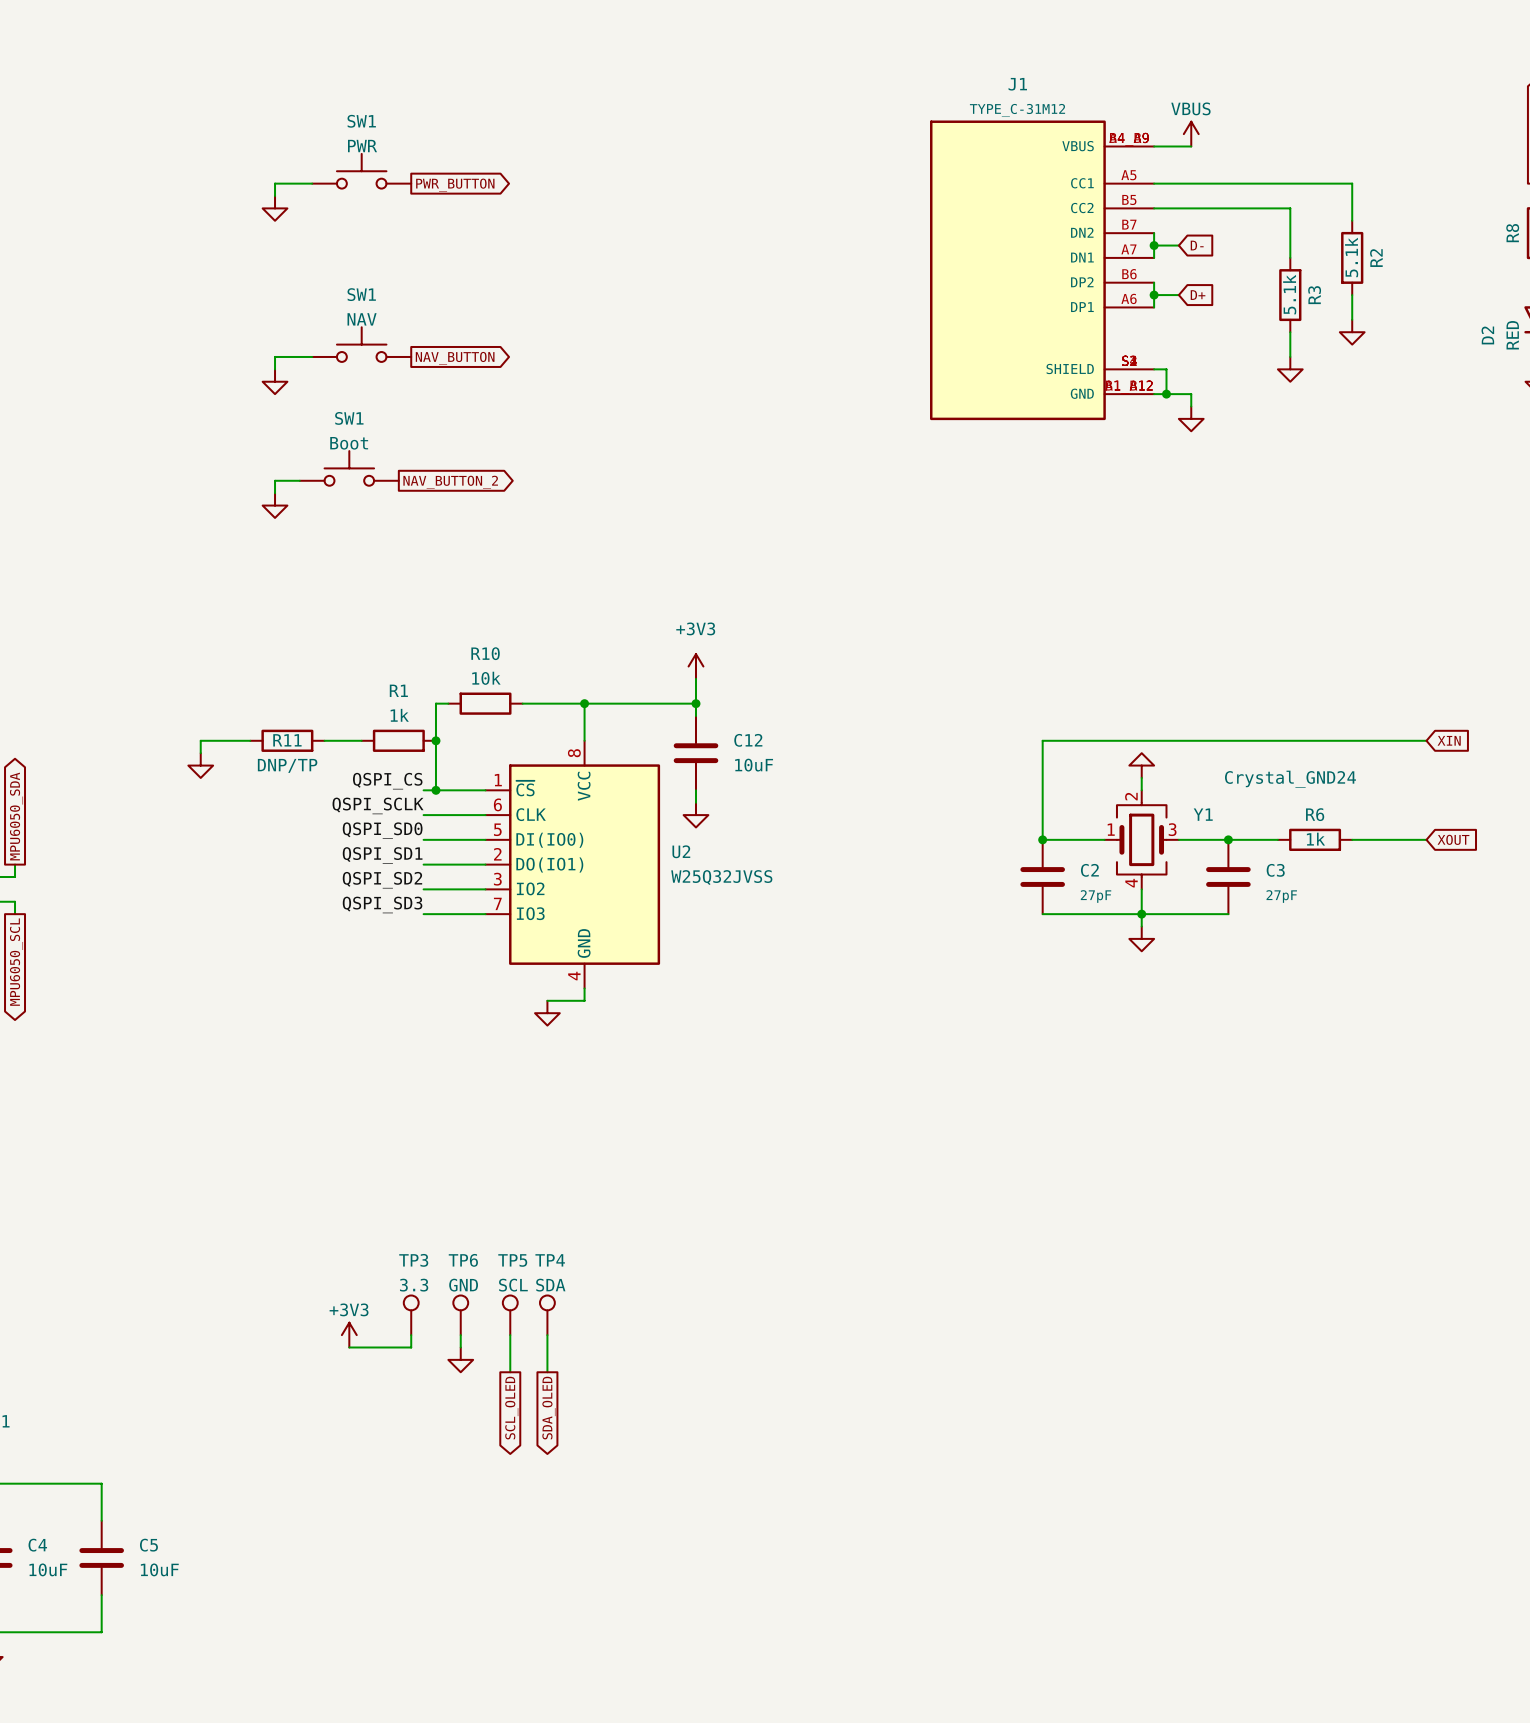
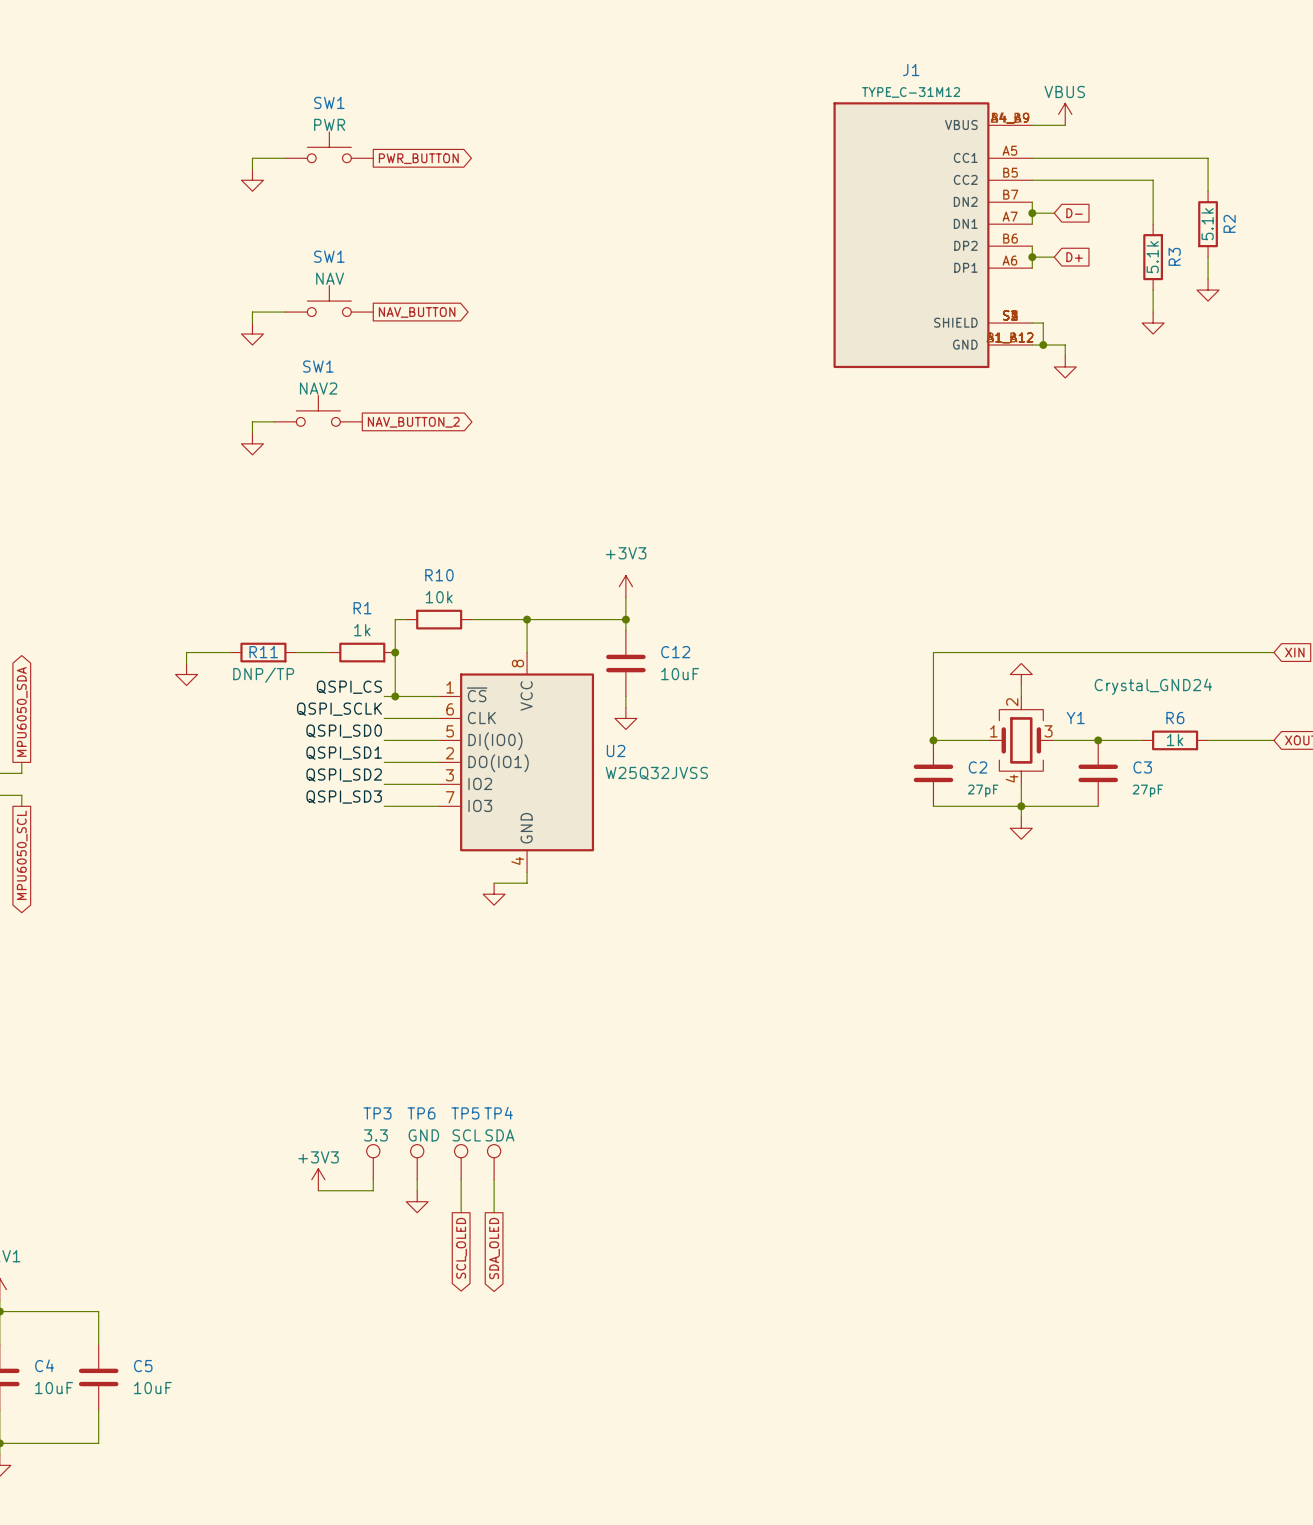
SW1 value: Boot (349, 443) -> NAV2 (318, 388)

